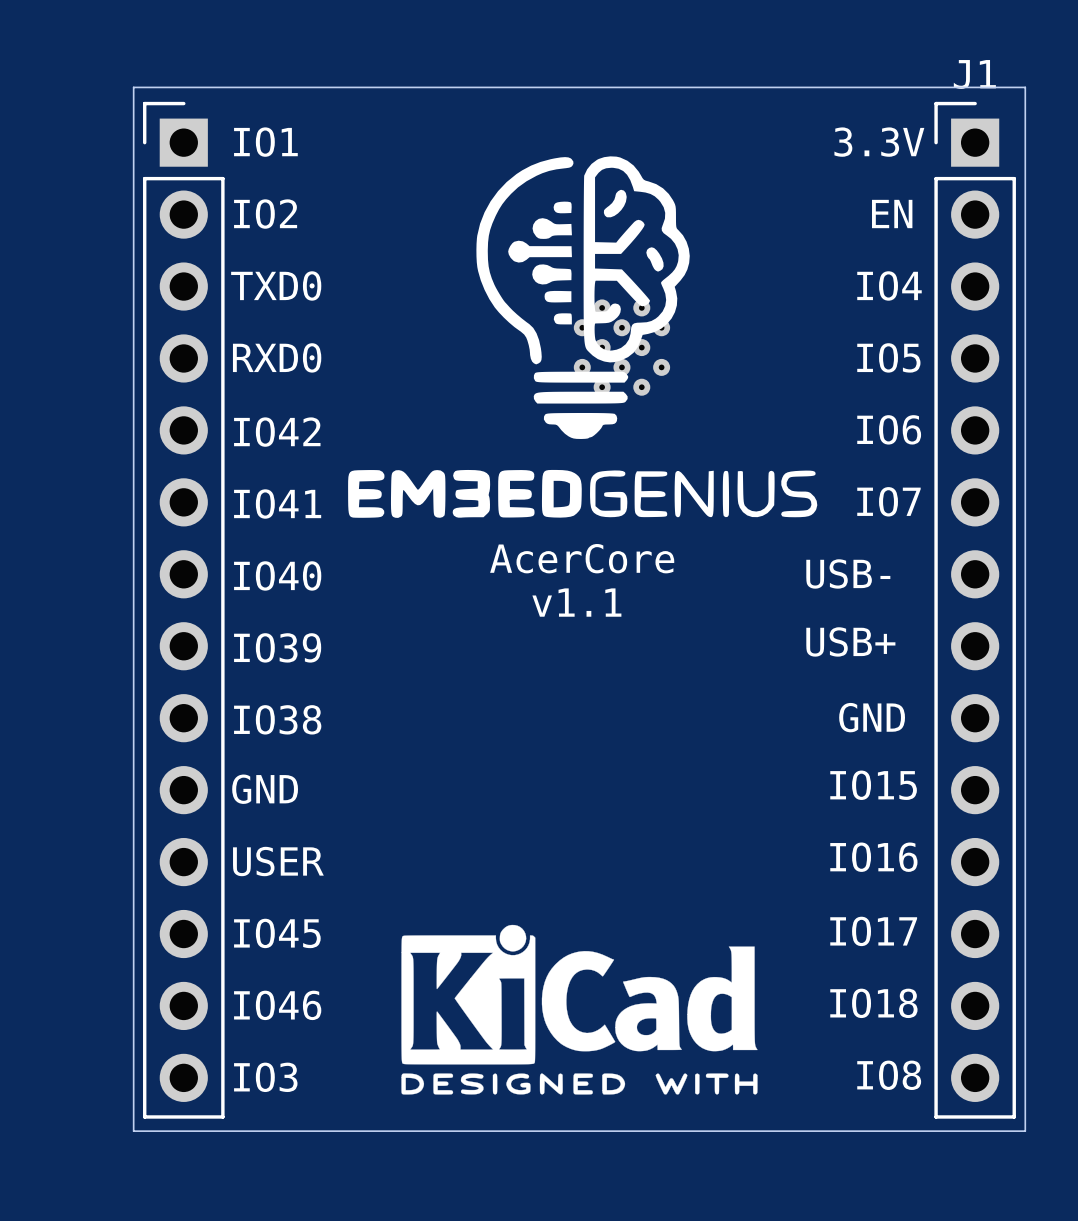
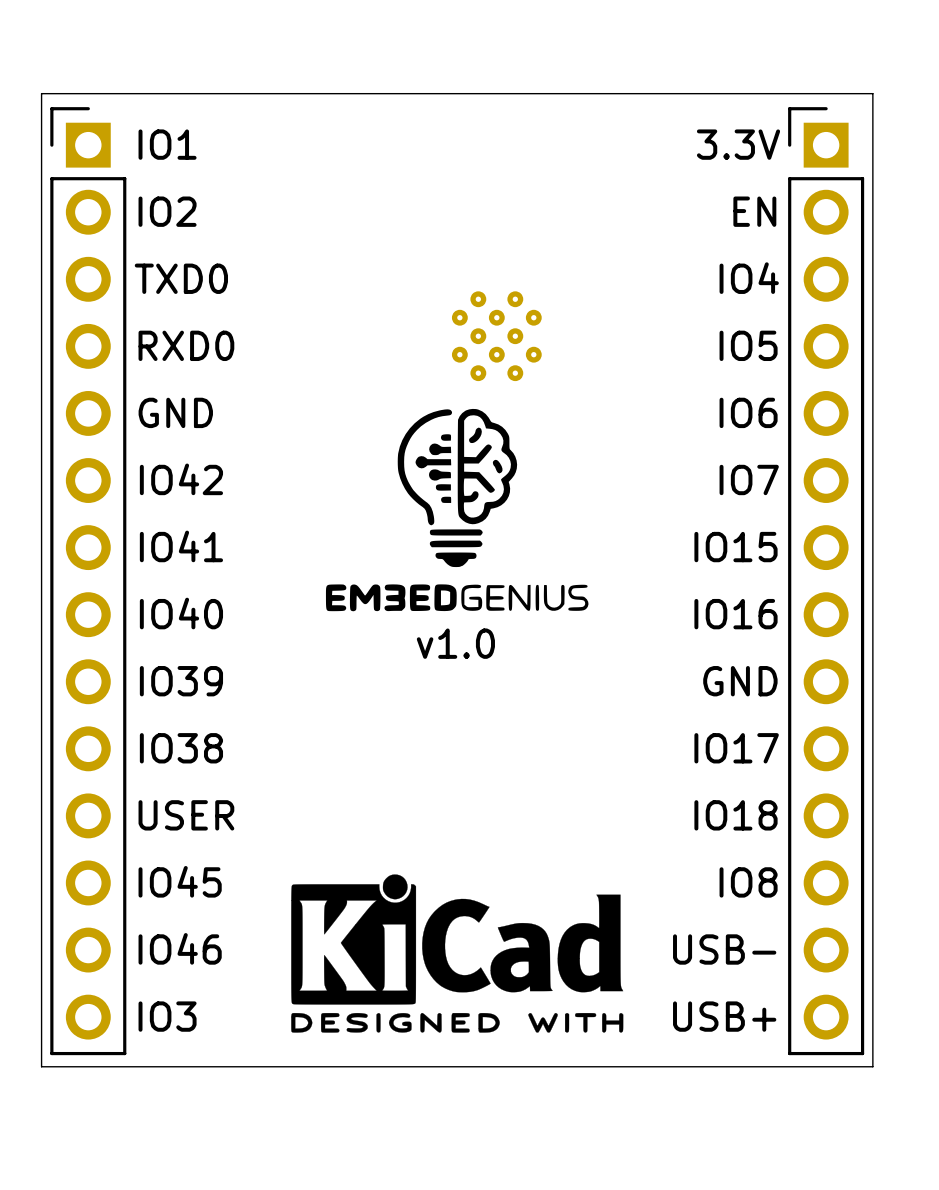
J1 name: J1 (974, 74) -> none
drawing: [348, 156, 818, 518] -> none
drawing: none -> [325, 408, 589, 612]
text: IO42 (277, 432) -> GND (175, 412)
text: IO41 (277, 504) -> IO42 (181, 479)
text: AcerCore (582, 558) -> none
text position: USB- (848, 573) -> USB- (724, 949)
text: IO40 (277, 575) -> IO41 (181, 546)
text: v1.1 (576, 602) -> none
text position: USB+ (850, 641) -> USB+ (724, 1016)
text: IO39 (277, 647) -> IO40 (181, 613)
text: none -> v1.0 (455, 643)
text: IO38 (277, 719) -> IO39 (181, 681)
text position: IO15 (873, 785) -> IO15 (735, 547)
text: GND (265, 789) -> IO38 (181, 748)
text position: IO16 (873, 857) -> IO16 (735, 614)
text position: IO17 (873, 931) -> IO17 (736, 748)
text position: IO18 (873, 1003) -> IO18 (735, 815)
text position: IO8 (889, 1075) -> IO8 (748, 882)

